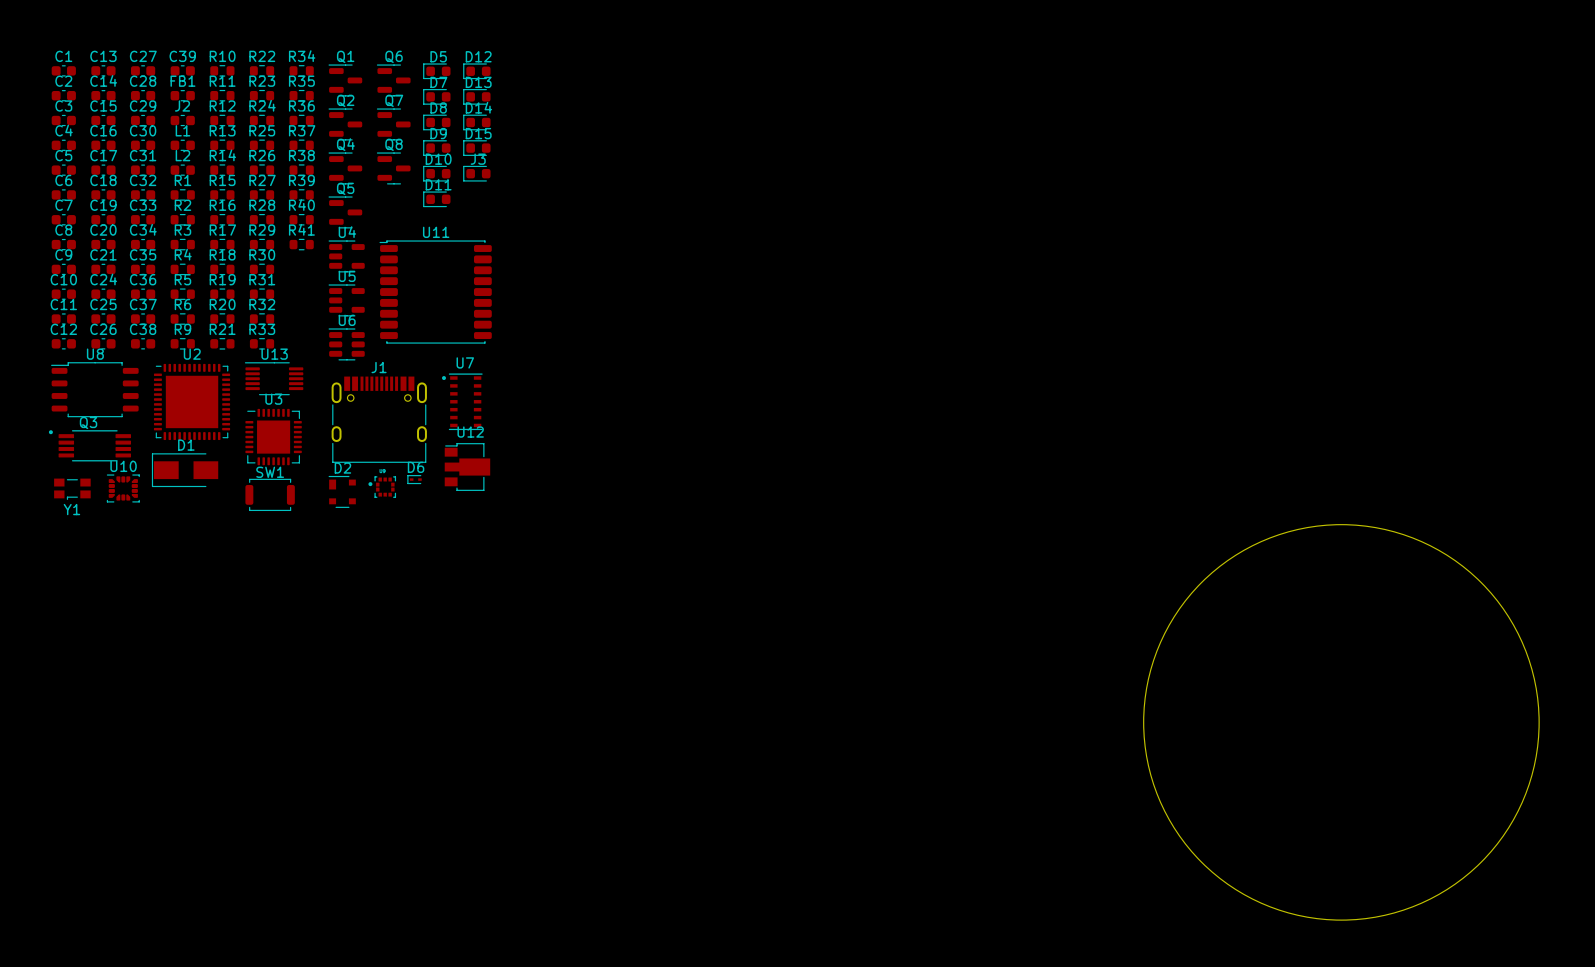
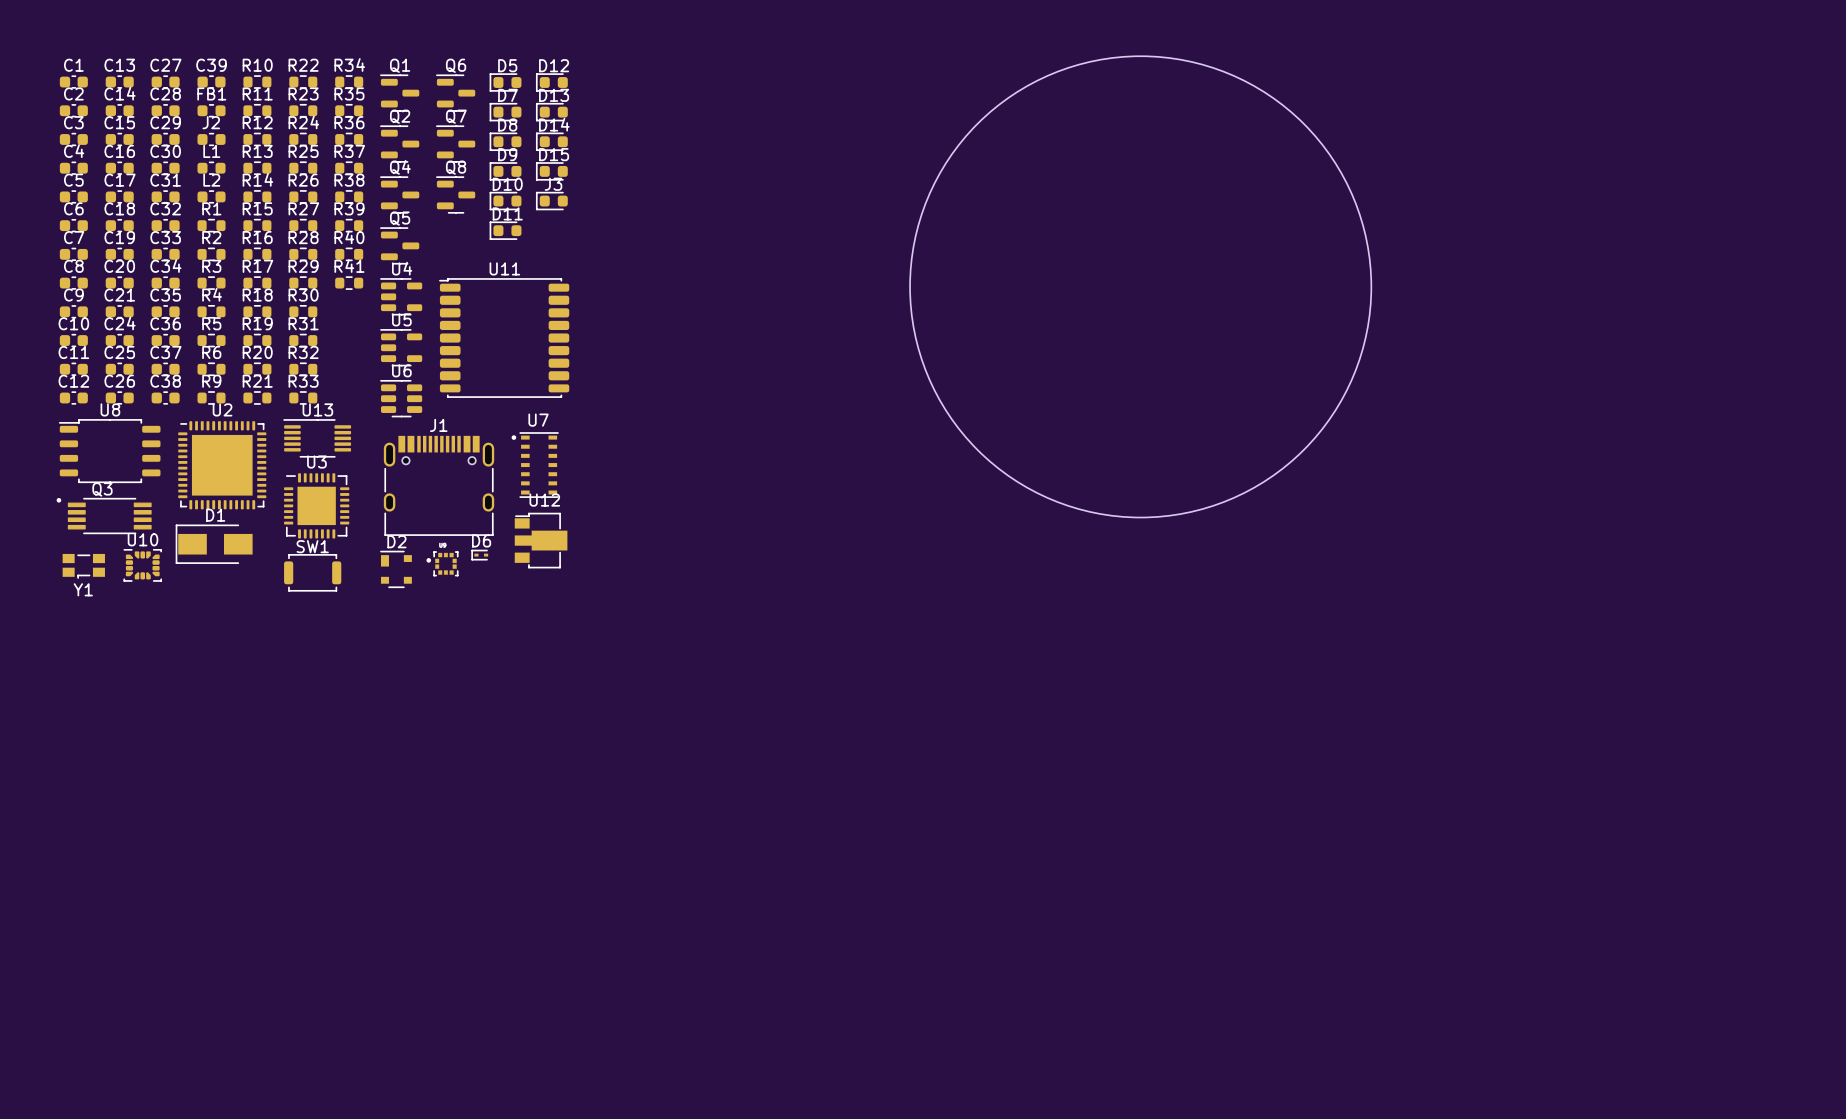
round board edge: none -> [909, 55, 1372, 518]
round board edge: [1143, 524, 1540, 921] -> none

